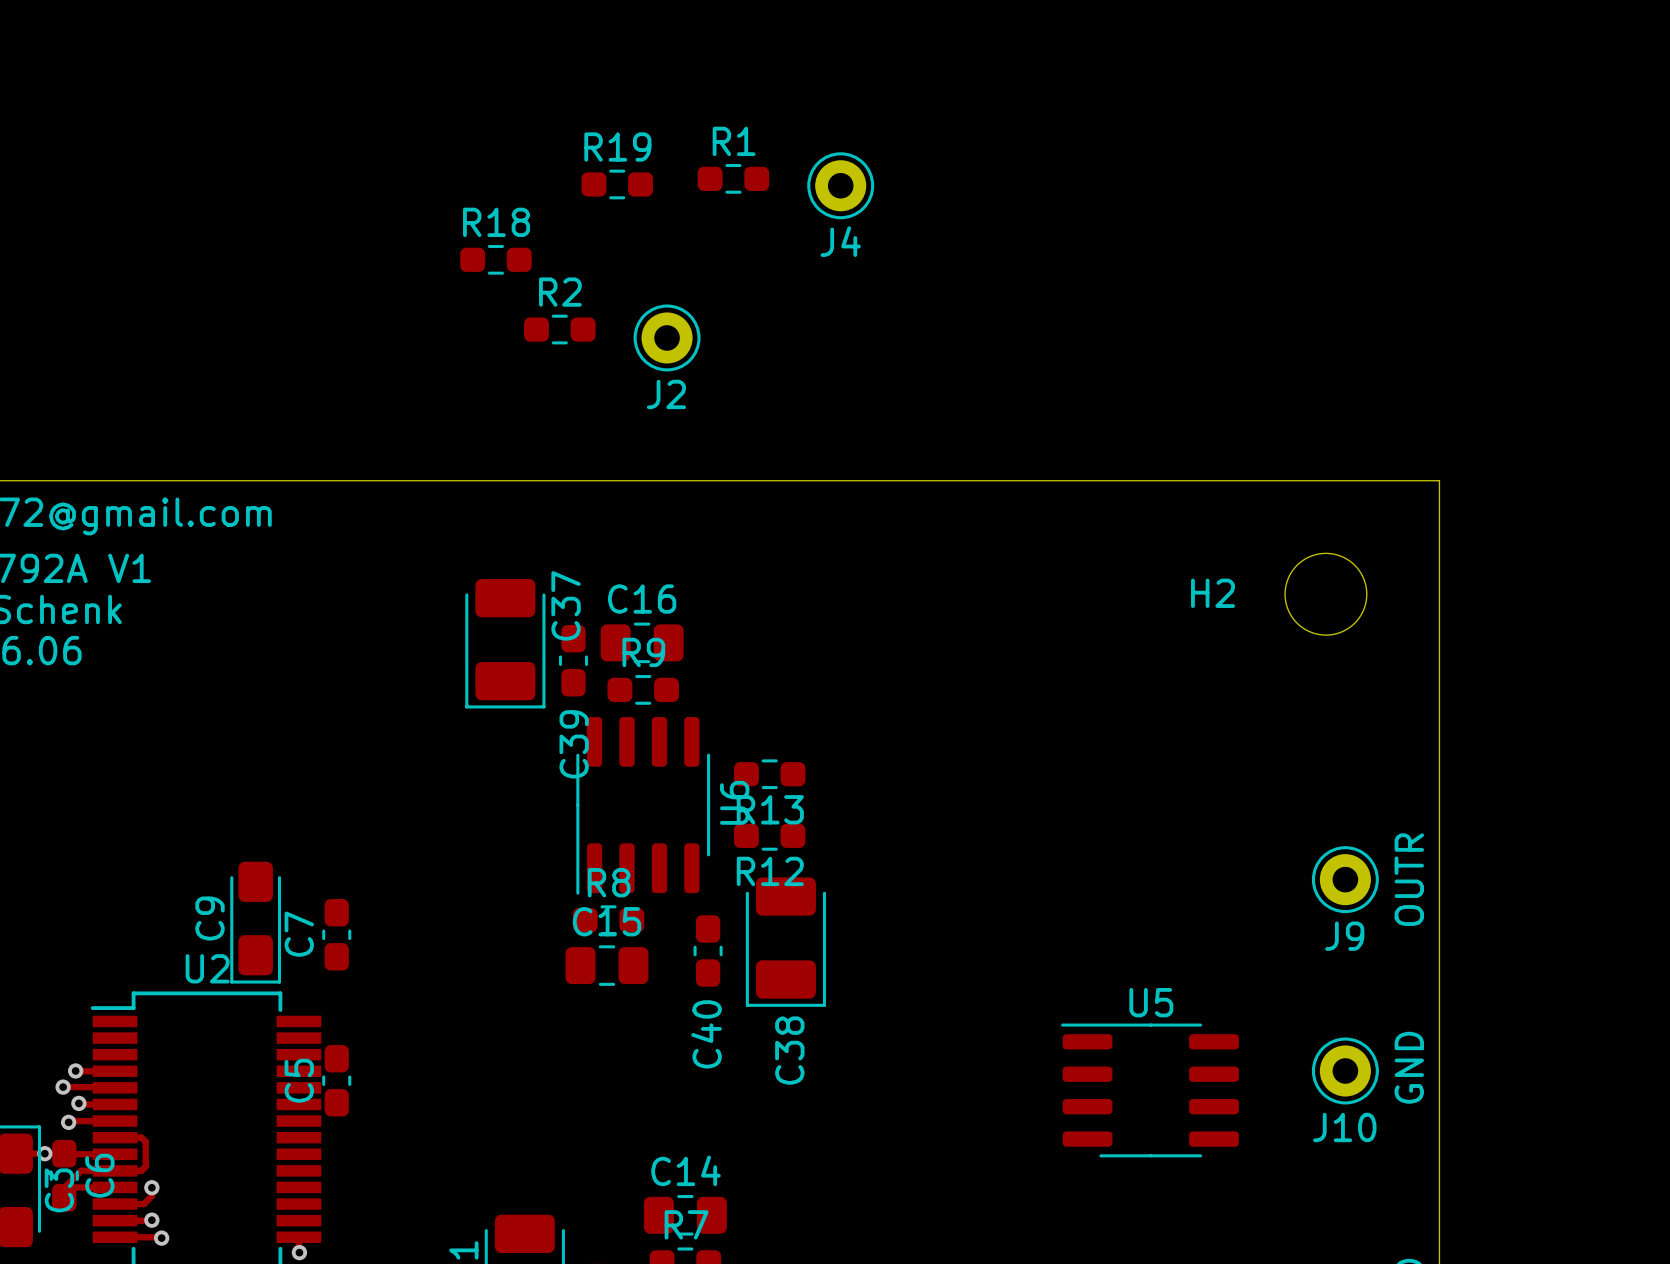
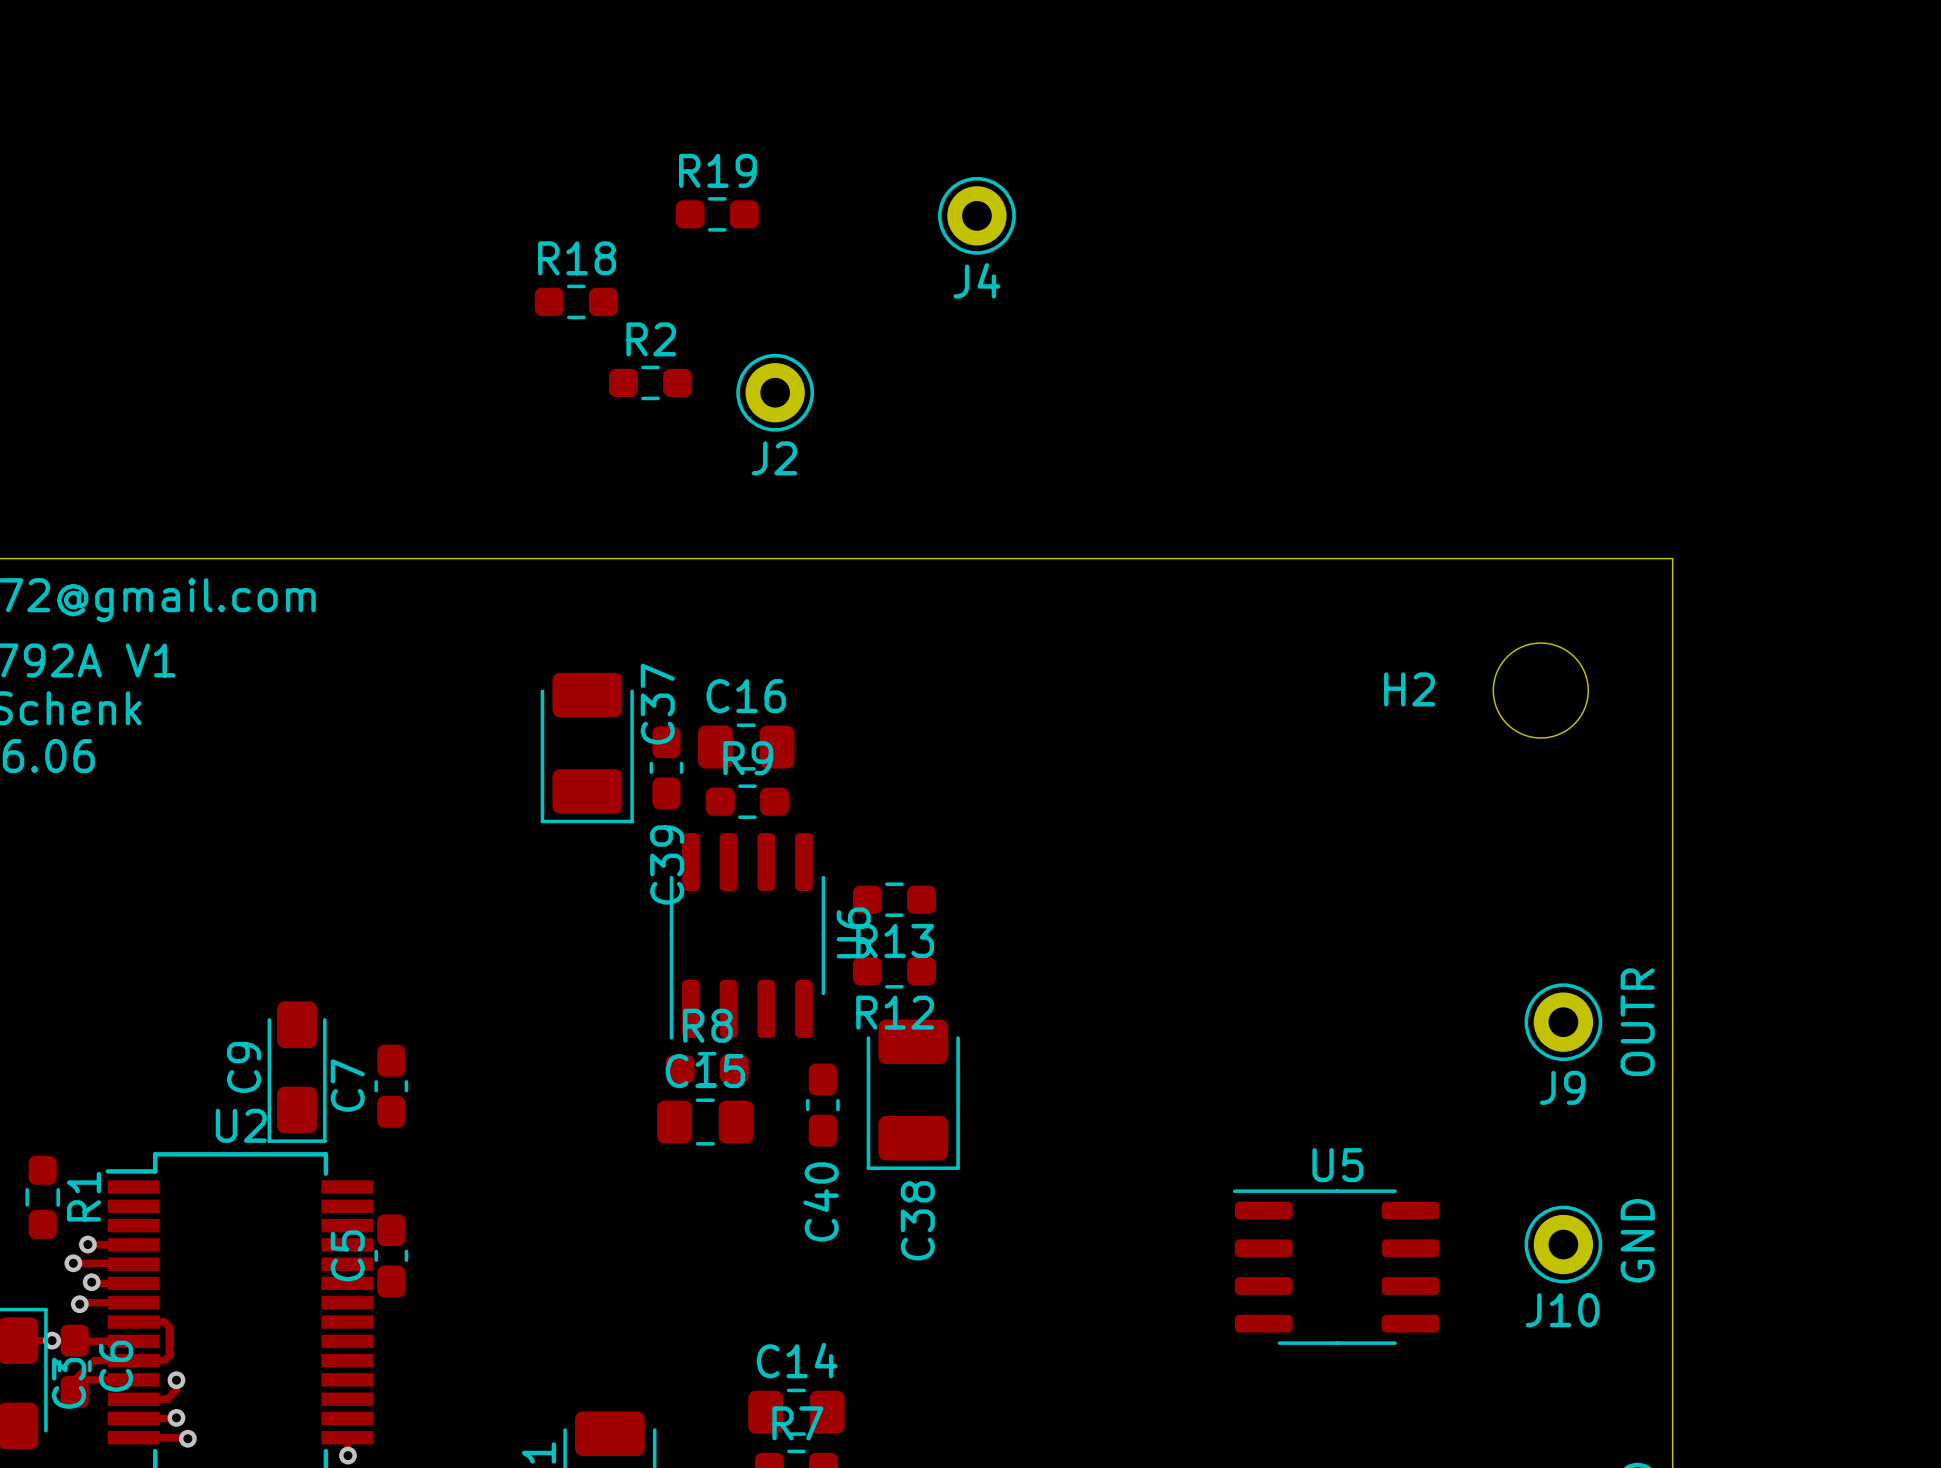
R1 rotation: 0° (733, 178) -> 90° clockwise (42, 1197)
R1 position: (733, 178) -> (42, 1197)

